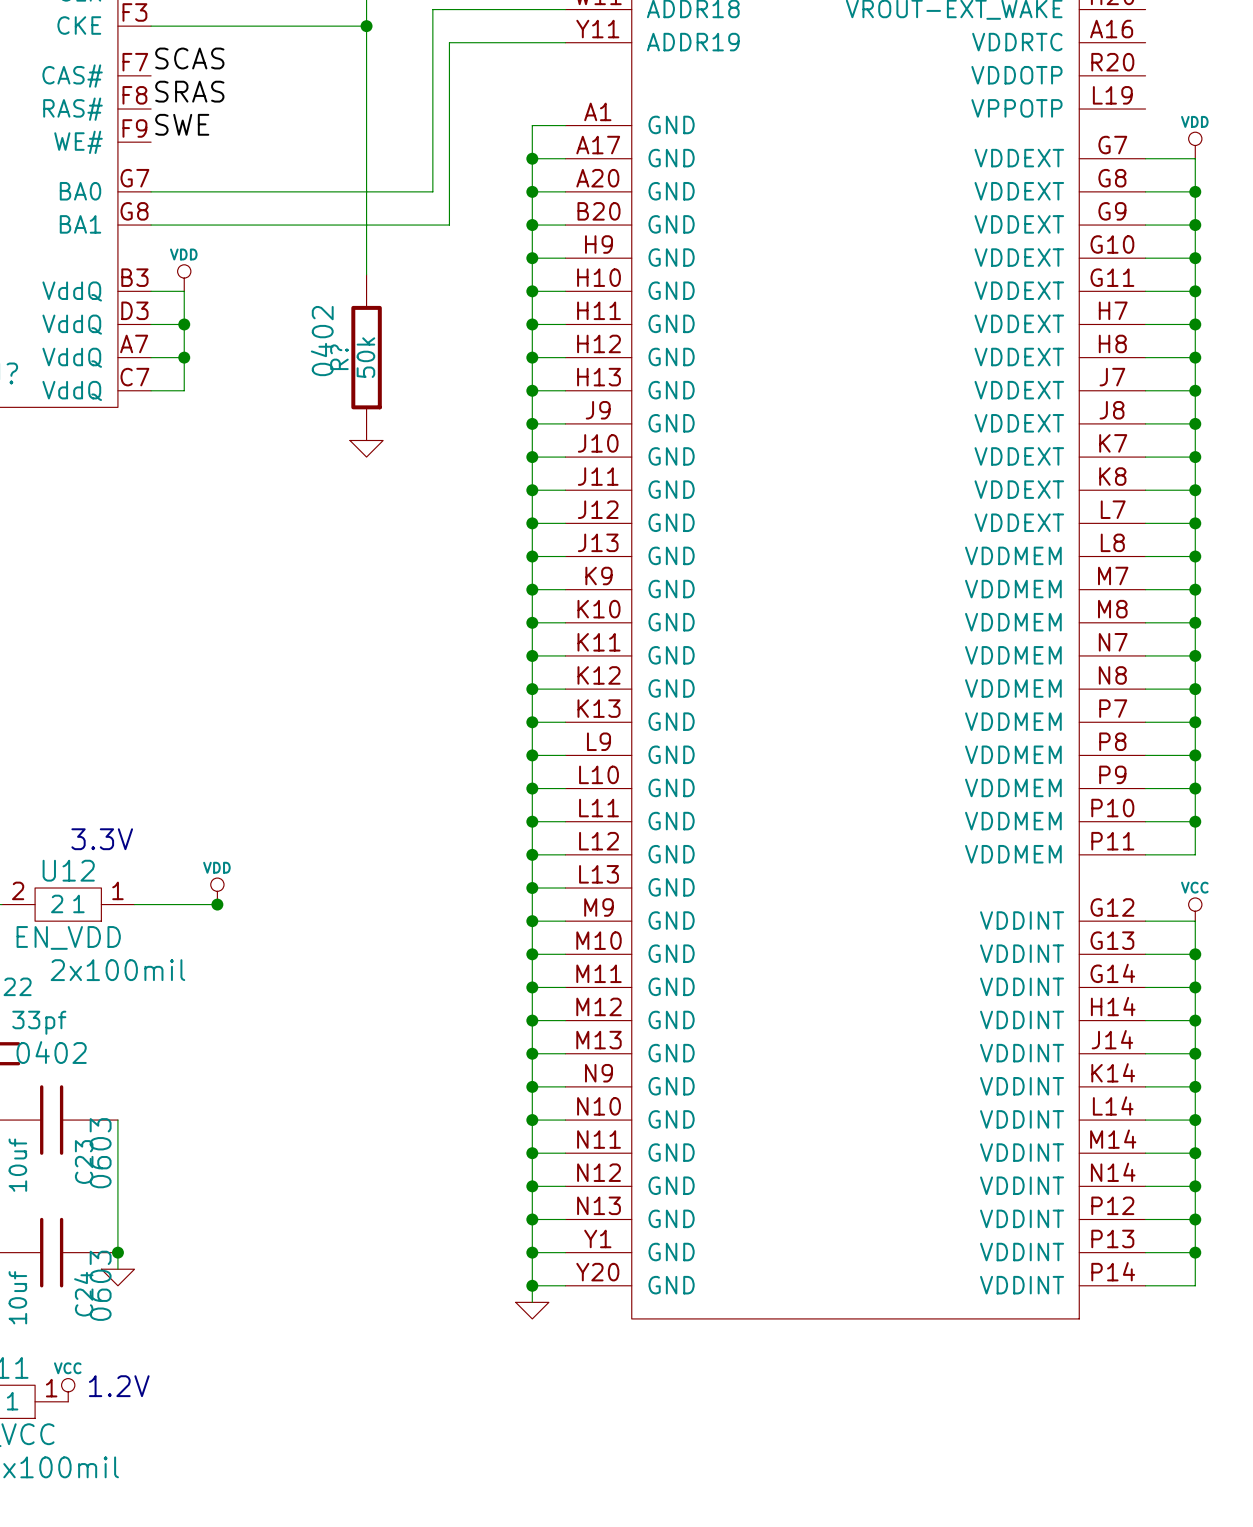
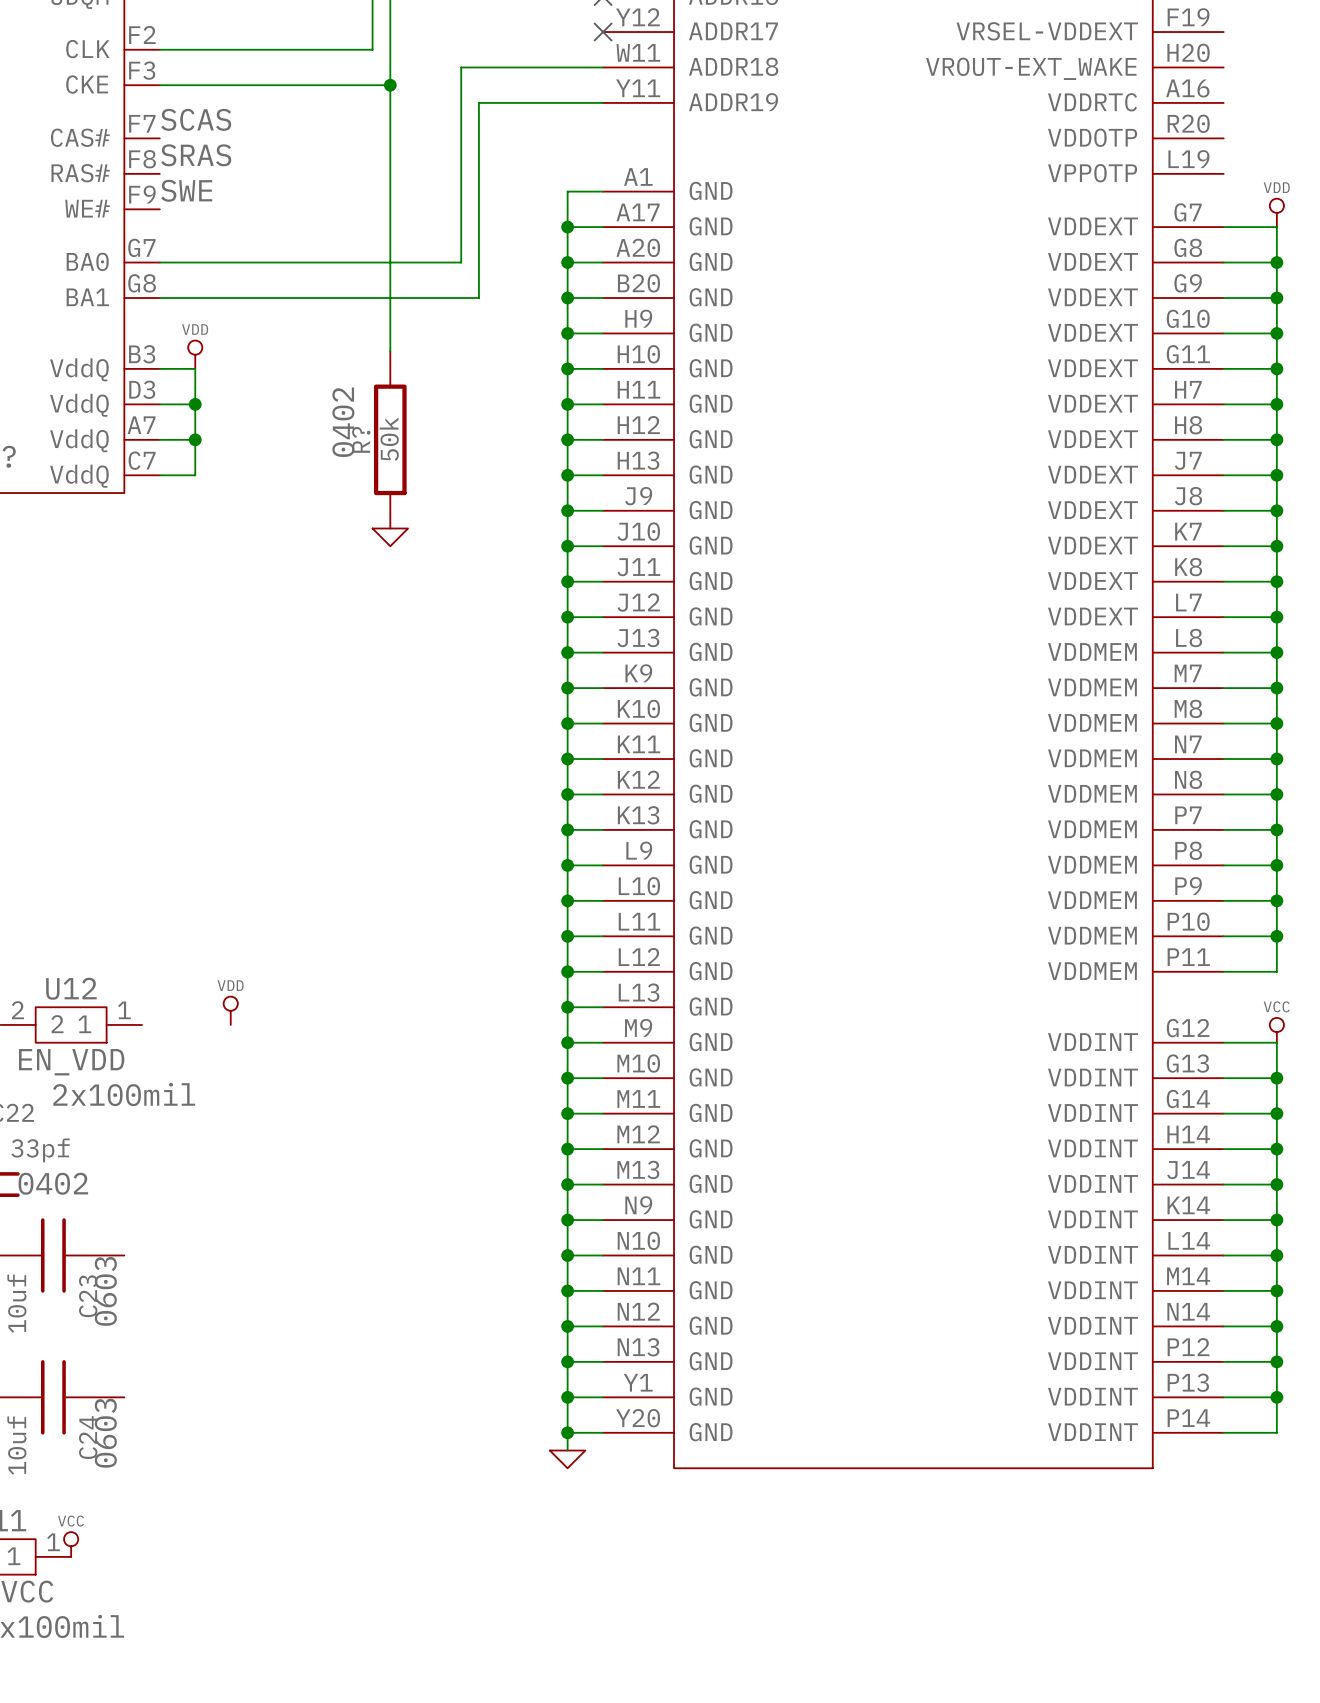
text: 3.3V (102, 839) -> none
wire: (134, 904) (217, 904) -> none
junction: (217, 904) -> none
wire: (117, 1120) (117, 1269) -> none
junction: (117, 1252) -> none
power symbol: (117, 1277) -> none
text: 1.2V (119, 1386) -> none

